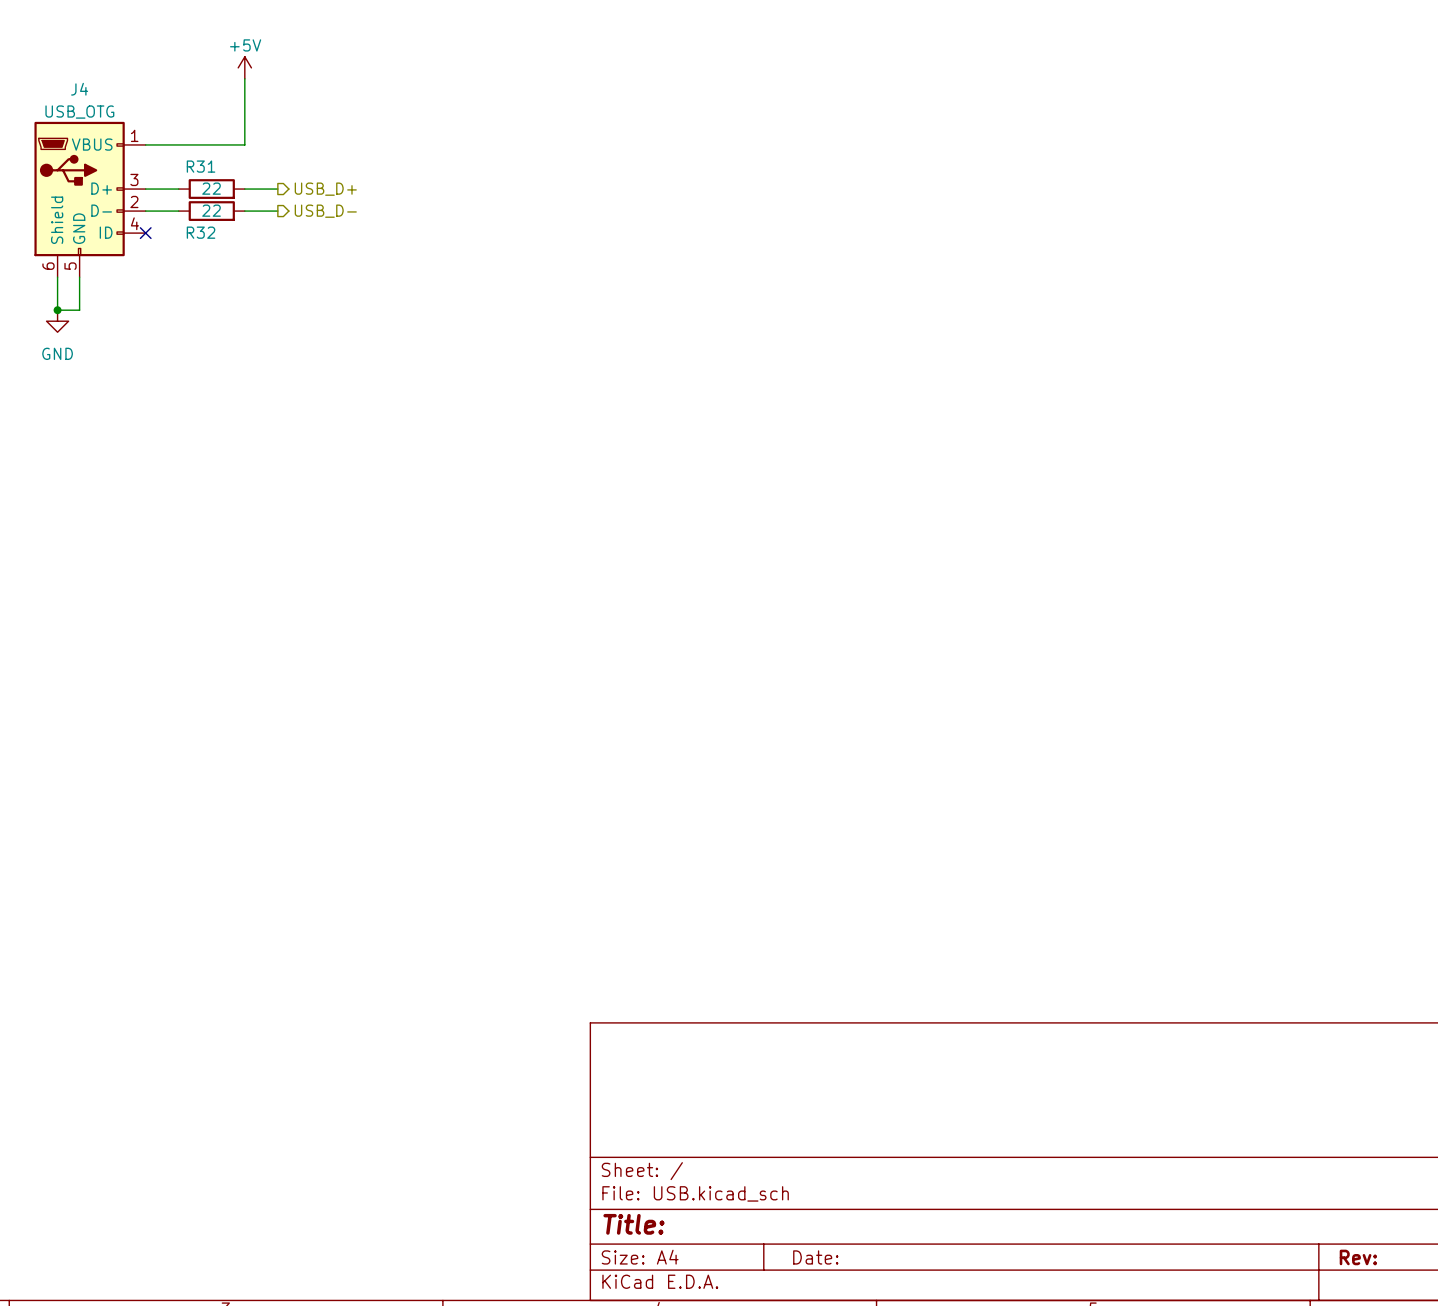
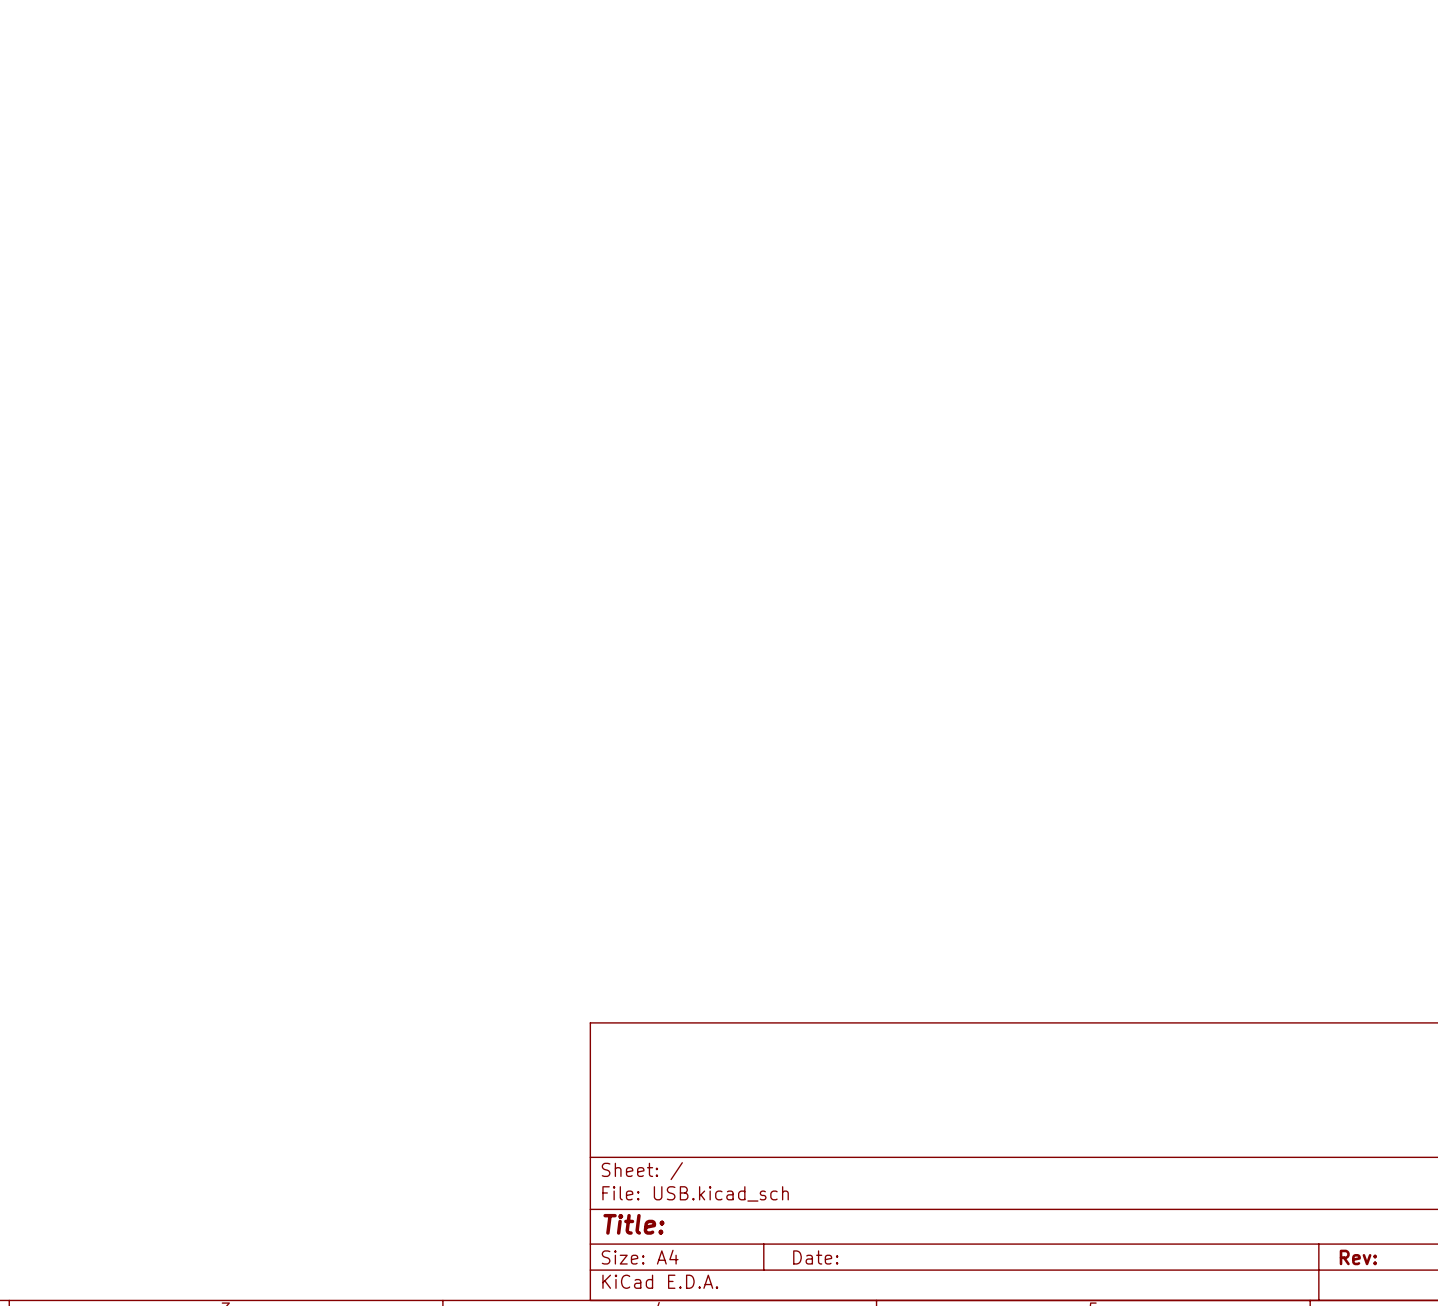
power symbol: +5V (244, 67) -> none
wire: (244, 78) (244, 144) (145, 144) -> none
wire: (145, 189) (178, 189) -> none
R31: 22 (211, 189) -> none
wire: (244, 189) (277, 189) -> none
hierarchical label: USB_D+ (325, 189) -> none
J4: USB_OTG (90, 199) -> none
wire: (145, 211) (178, 211) -> none
R32: 22 (211, 211) -> none
wire: (244, 211) (277, 211) -> none
hierarchical label: USB_D- (325, 211) -> none
no-connect mark: (145, 233) -> none
wire: (57, 277) (57, 310) (79, 310) (79, 277) -> none
junction: (57, 310) -> none
power symbol: GND (57, 321) -> none

